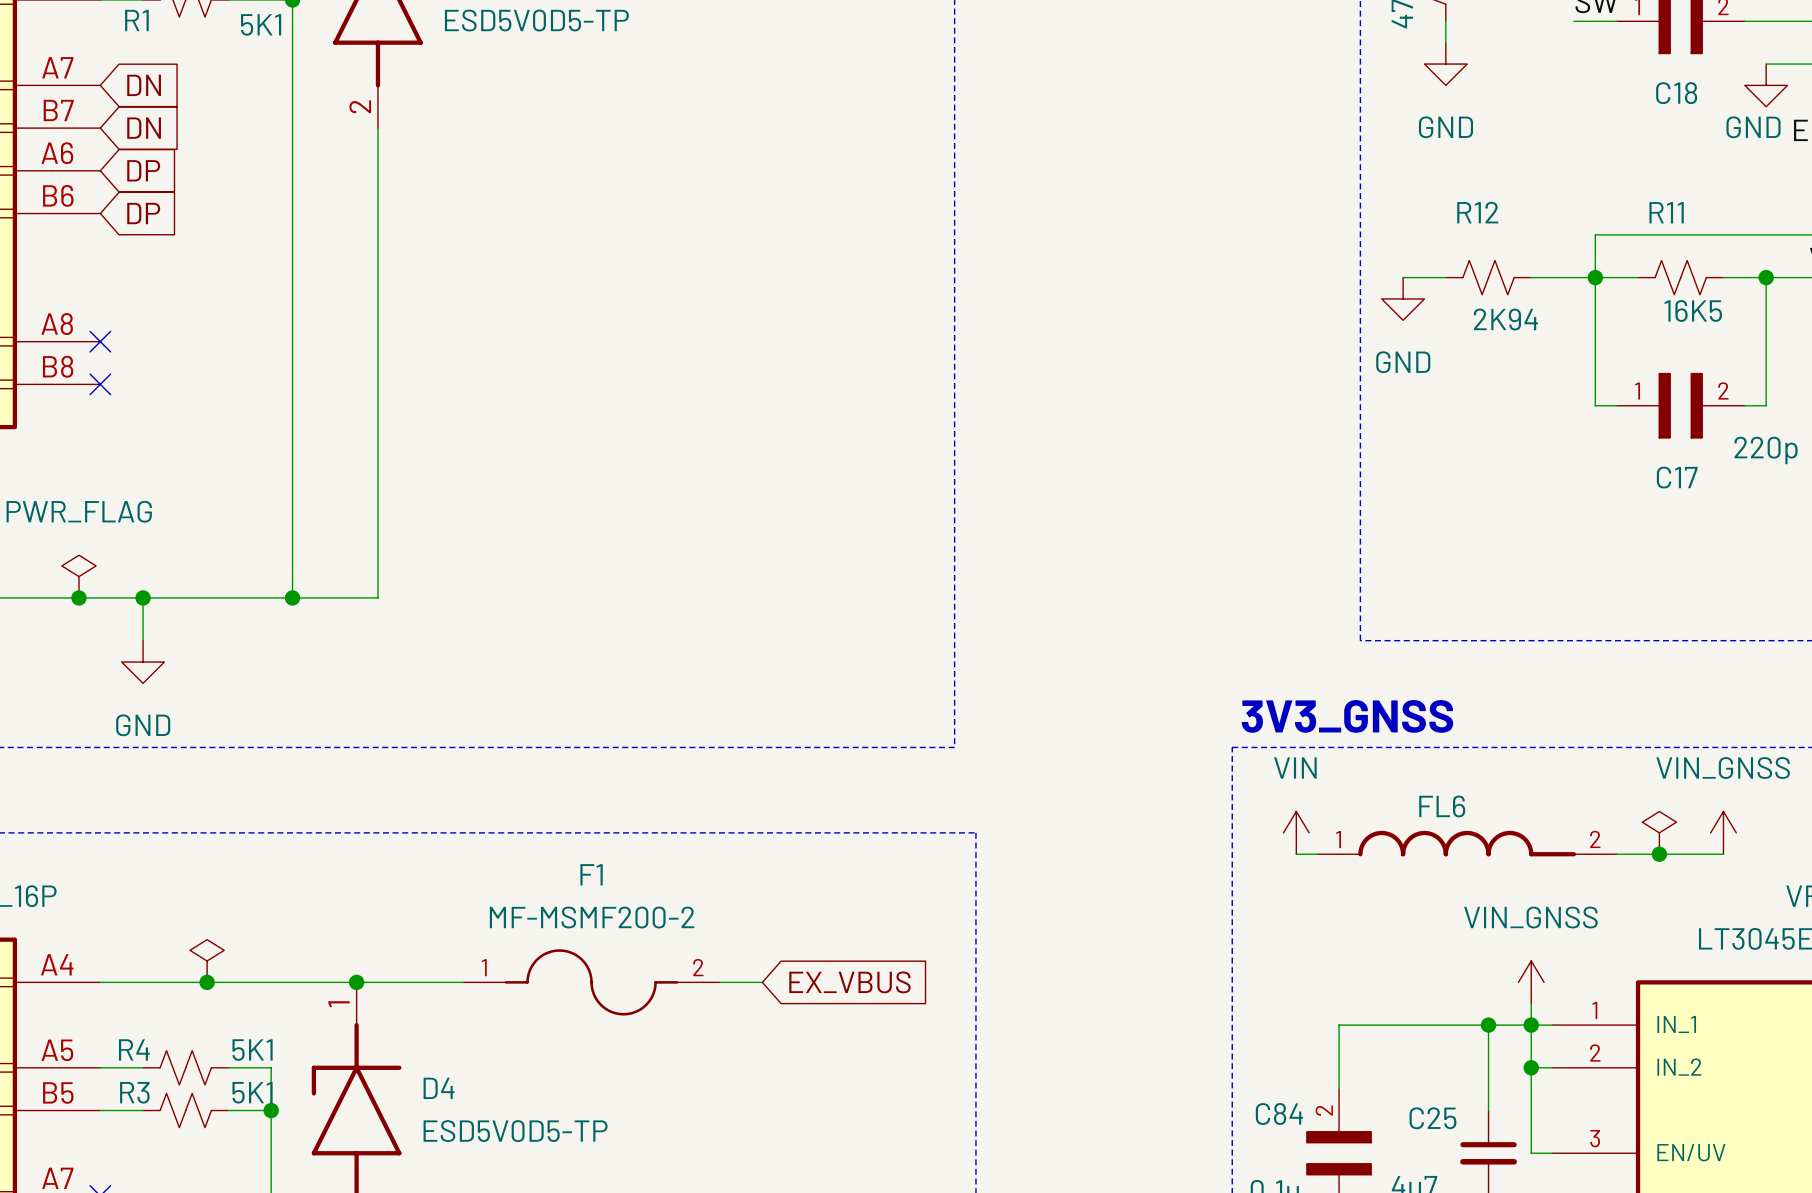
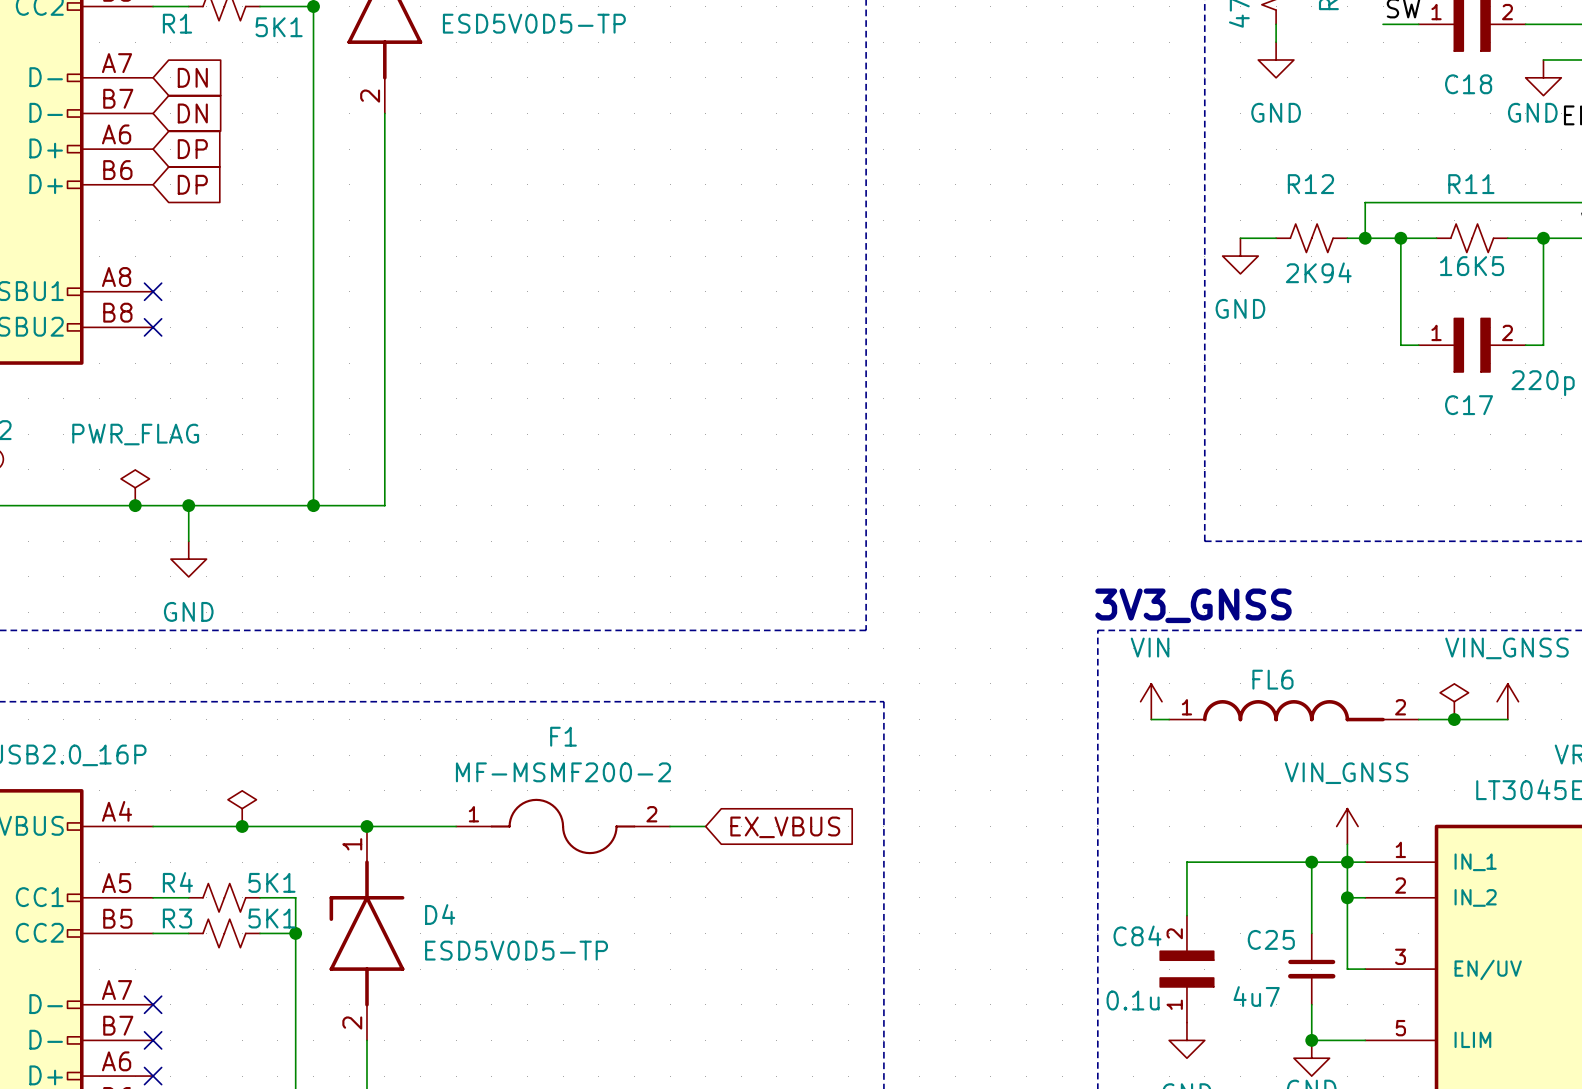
wire: (1595, 234) (1595, 277) -> (1400, 202) (1365, 202) (1365, 238)
junction: none -> (1365, 238)

